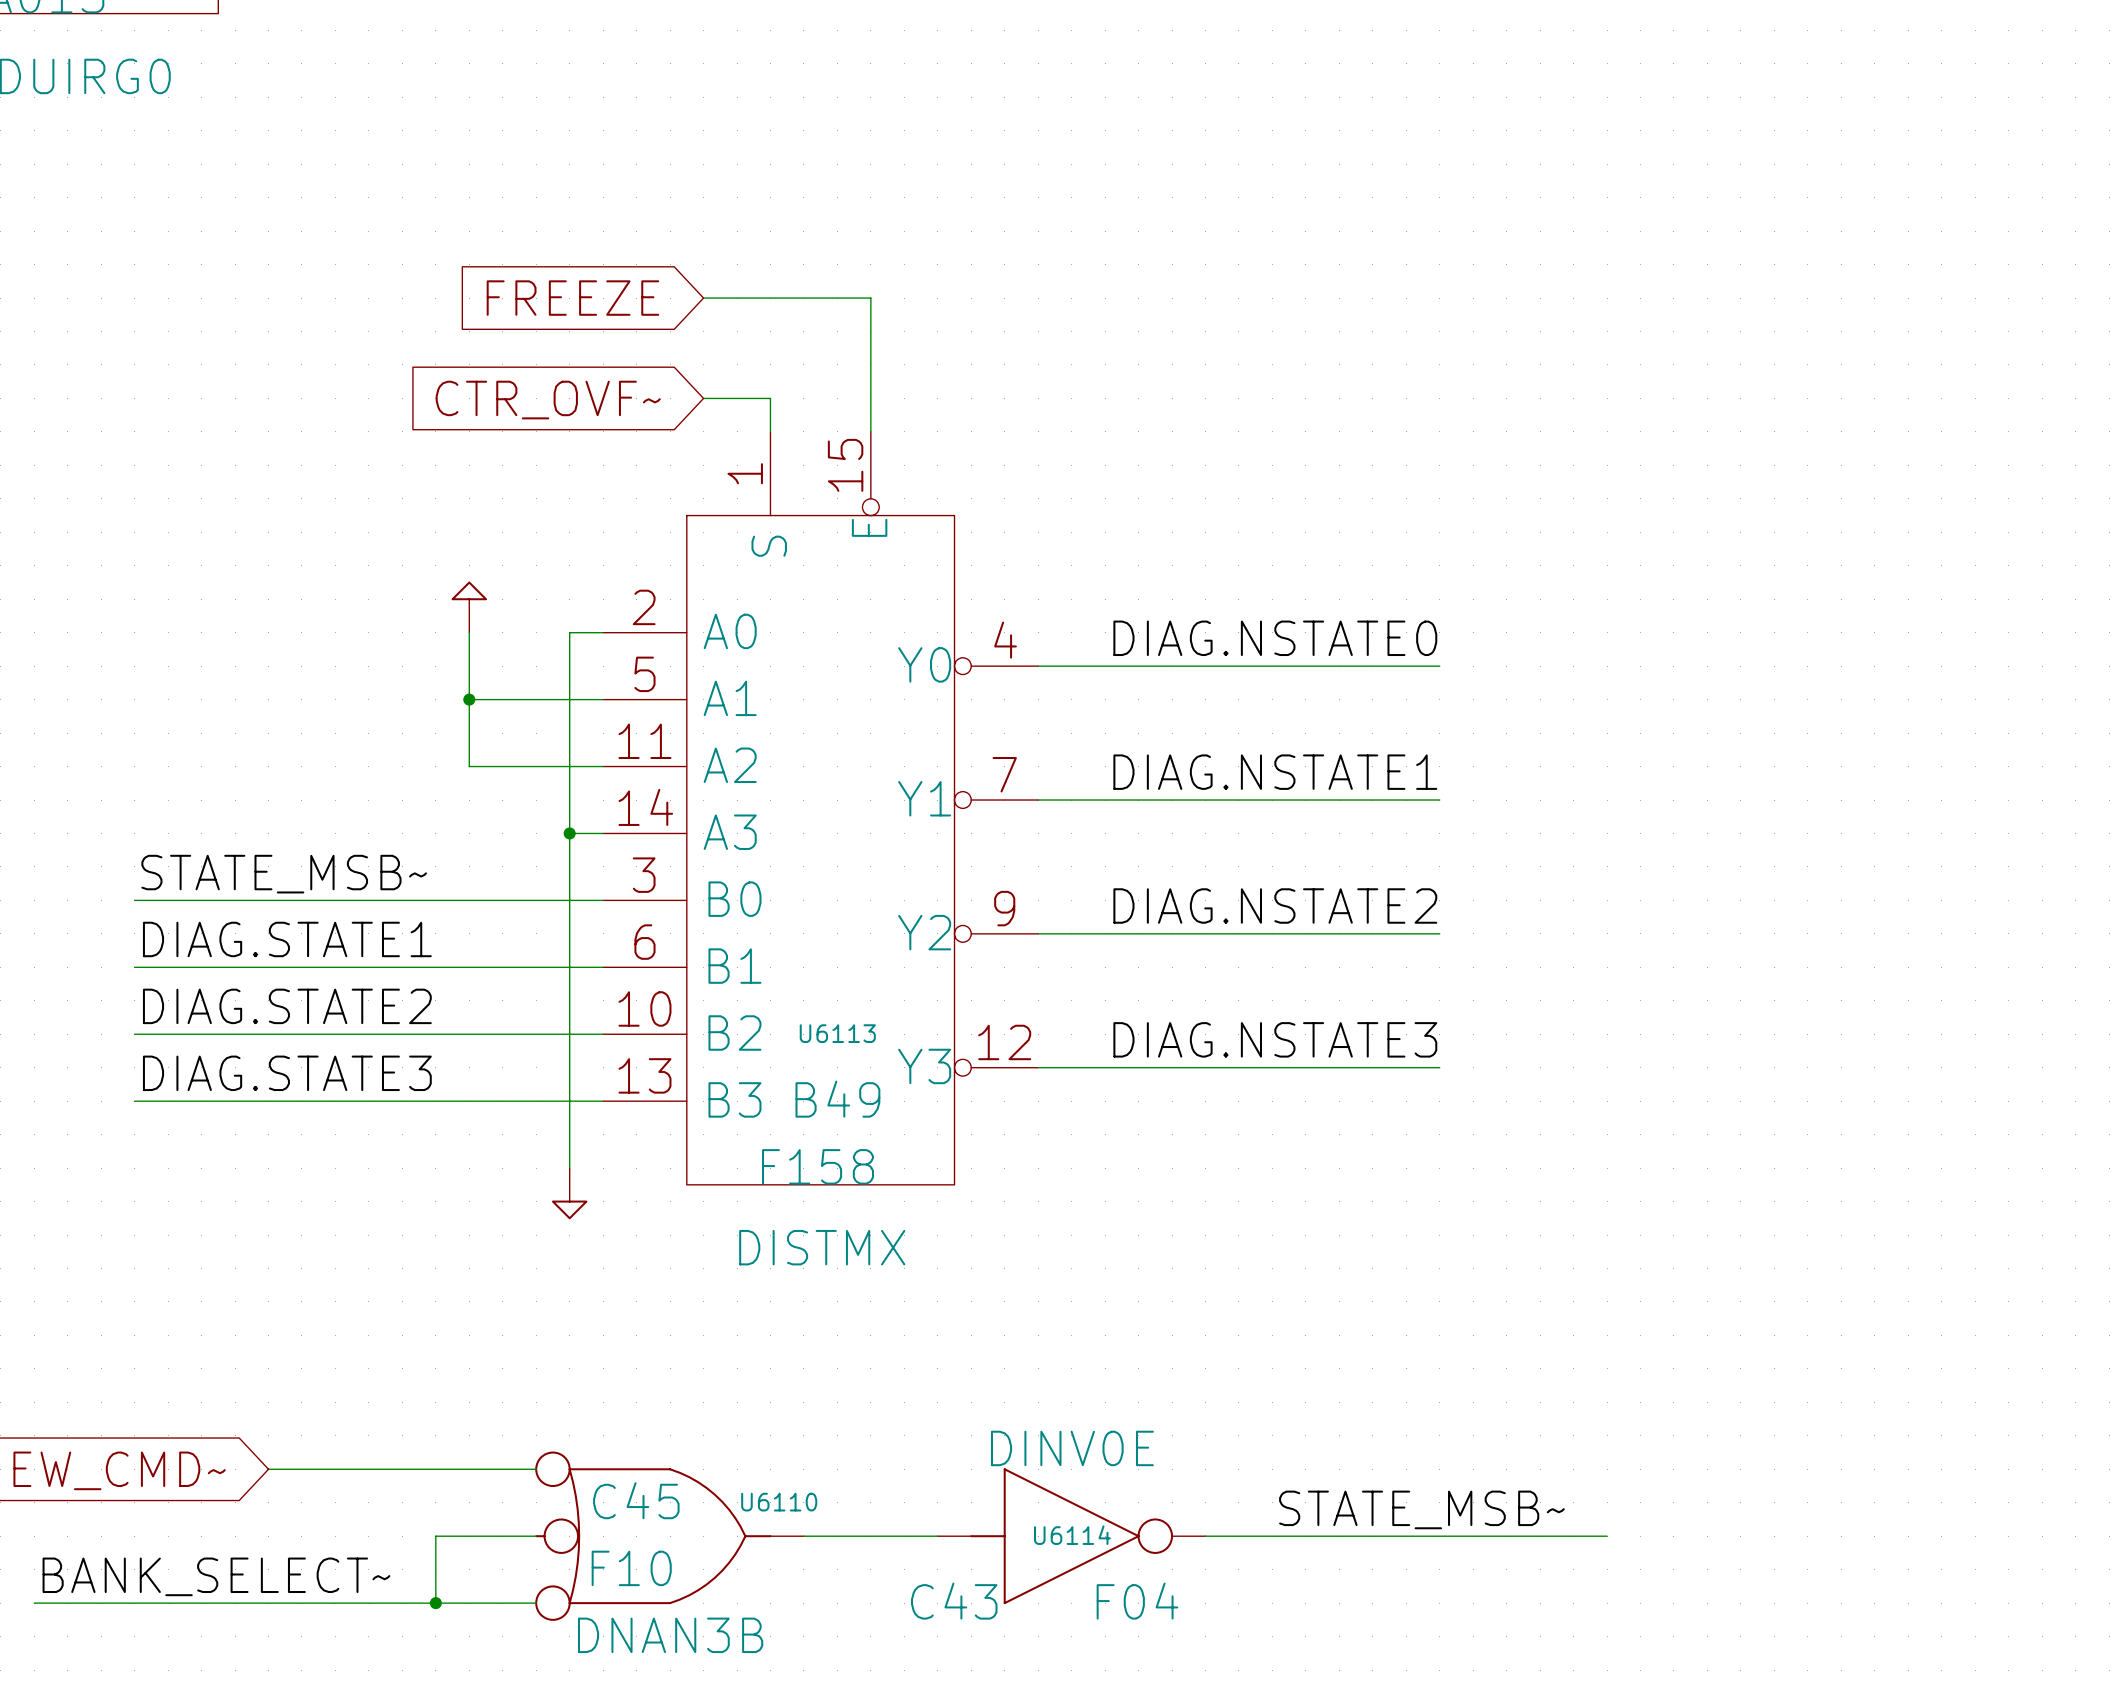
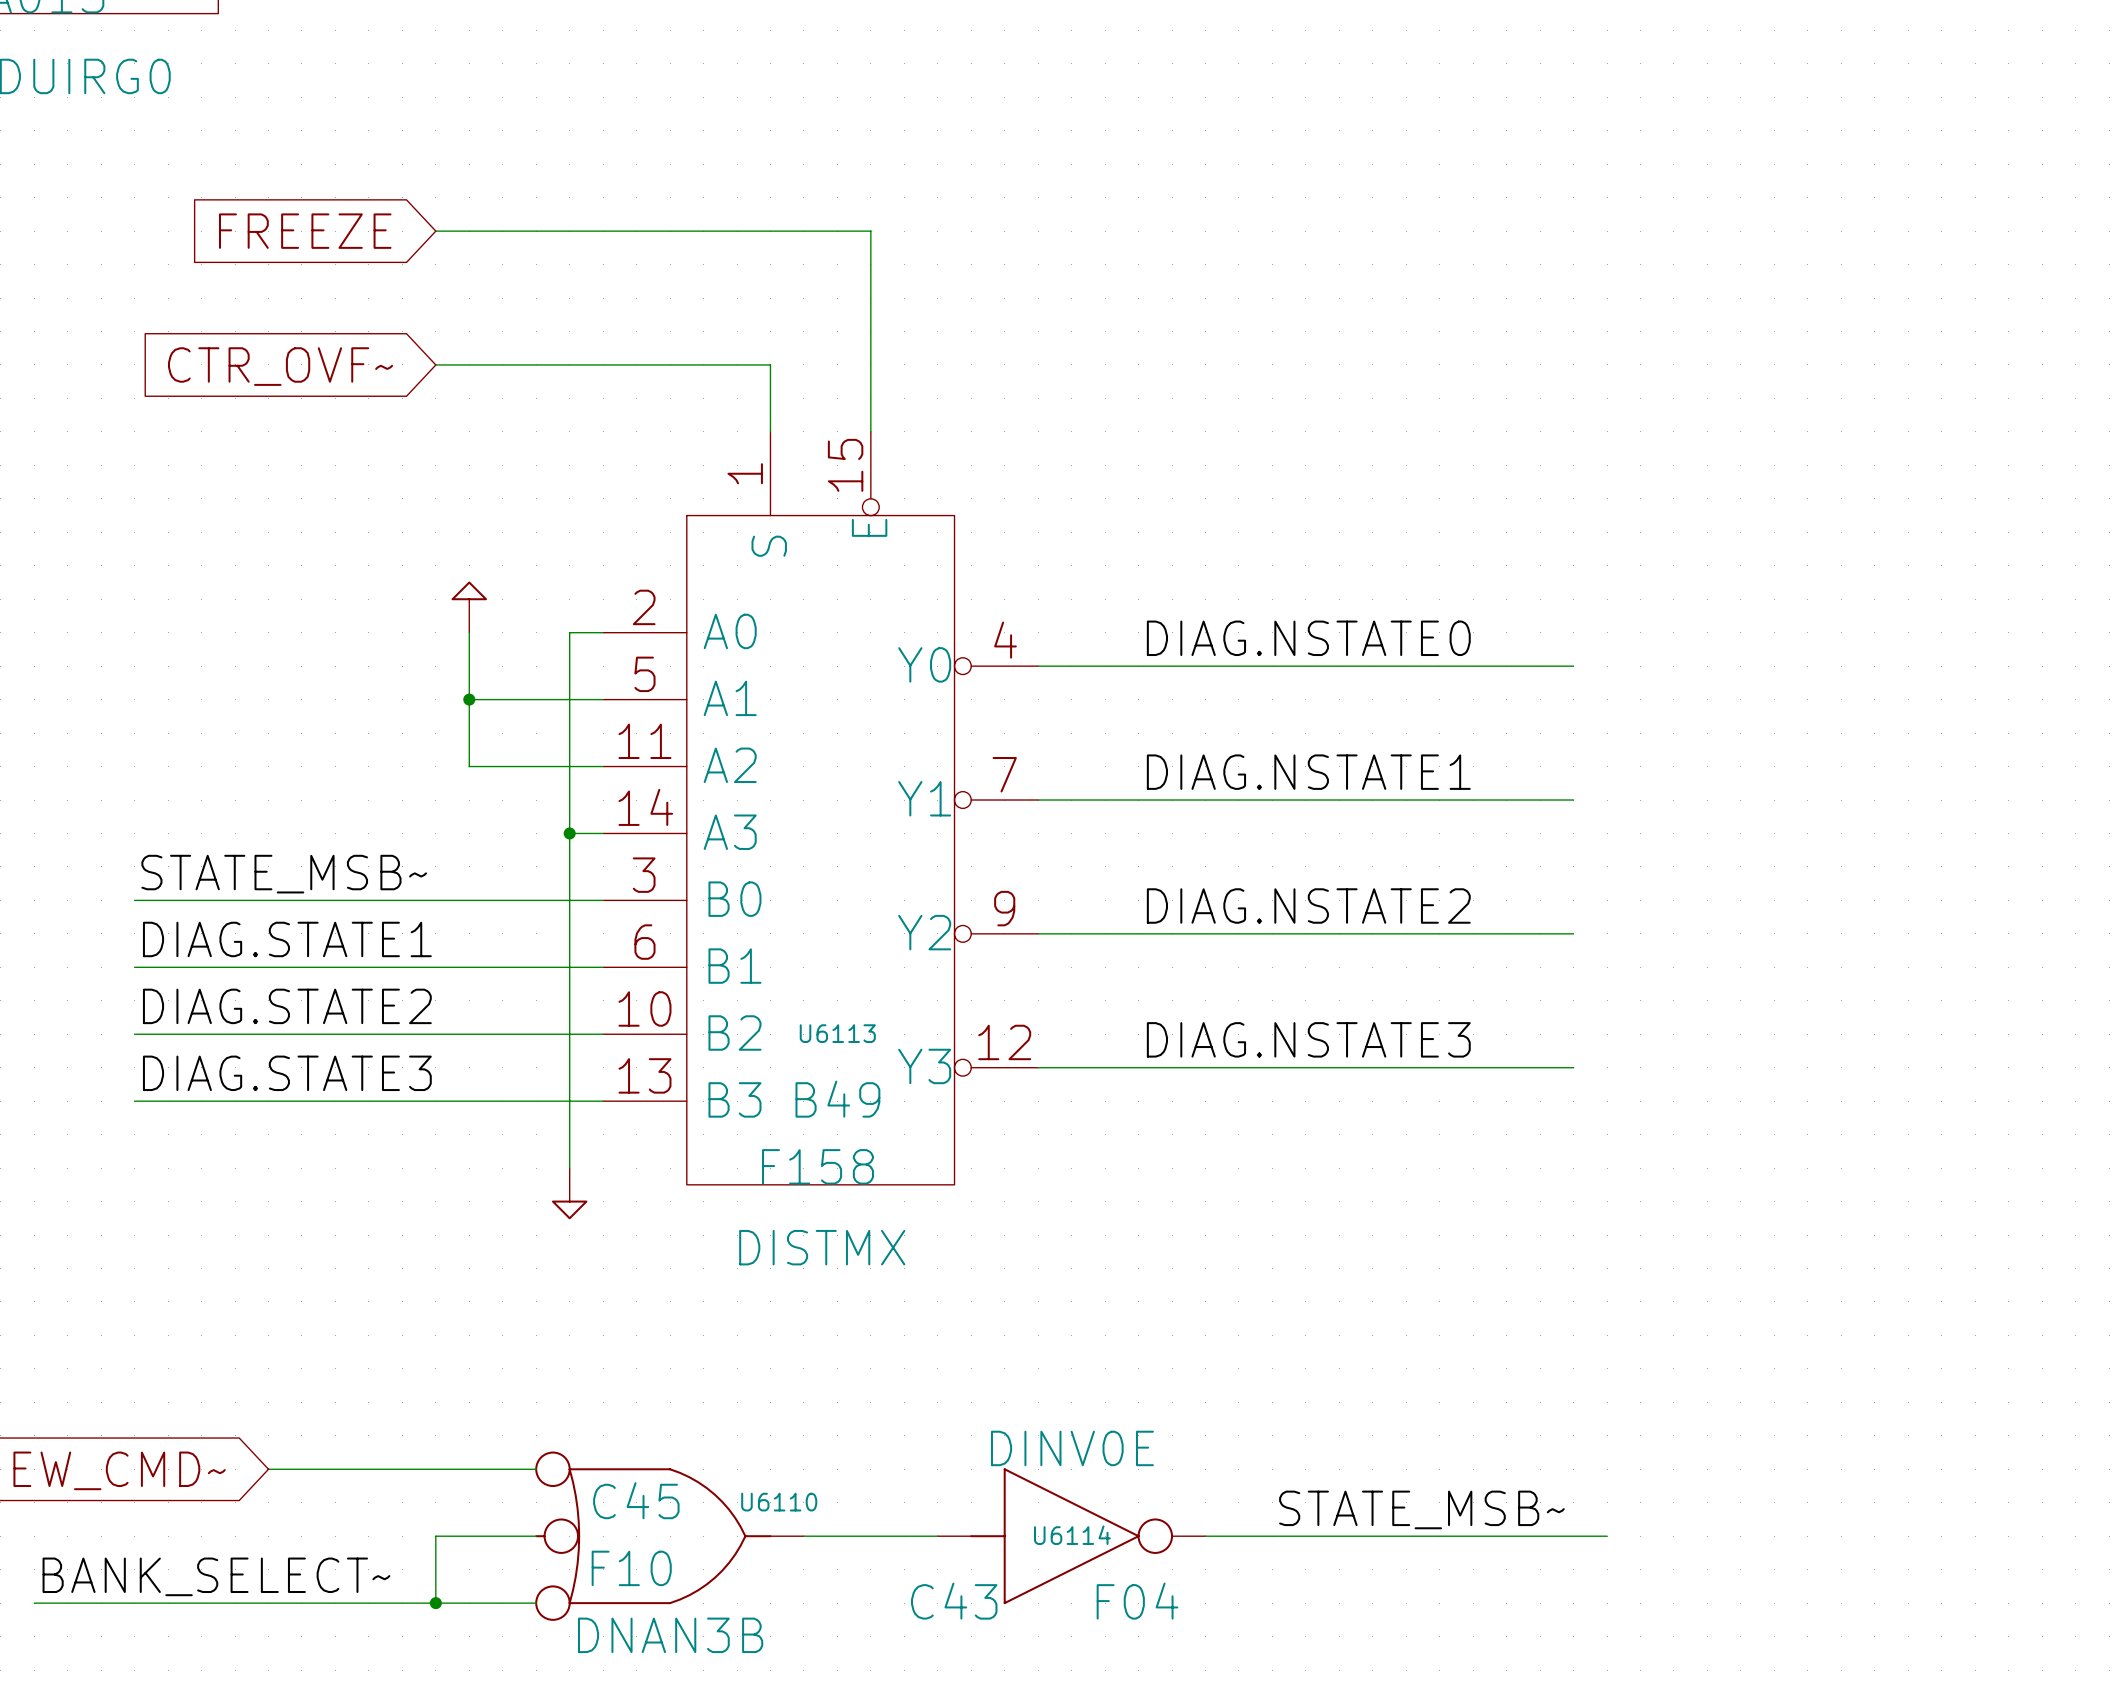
global label position: FREEZE (572, 298) -> FREEZE (305, 231)
wire: (703, 298) (870, 298) -> (435, 231) (870, 231) (870, 298)
wire: (703, 398) (770, 398) -> (435, 364) (770, 364) (770, 398)
global label position: CTR_OVF~ (548, 400) -> CTR_OVF~ (280, 366)
label position: DIAG.NSTATE0 (1275, 638) -> DIAG.NSTATE0 (1308, 638)
wire: none -> (1439, 666) (1573, 666)
label position: DIAG.NSTATE1 (1275, 772) -> DIAG.NSTATE1 (1308, 772)
wire: none -> (1439, 800) (1573, 800)
label position: DIAG.NSTATE2 (1275, 906) -> DIAG.NSTATE2 (1308, 906)
wire: none -> (1439, 933) (1573, 933)
label position: DIAG.NSTATE3 (1275, 1039) -> DIAG.NSTATE3 (1308, 1039)
wire: none -> (1439, 1067) (1573, 1067)

